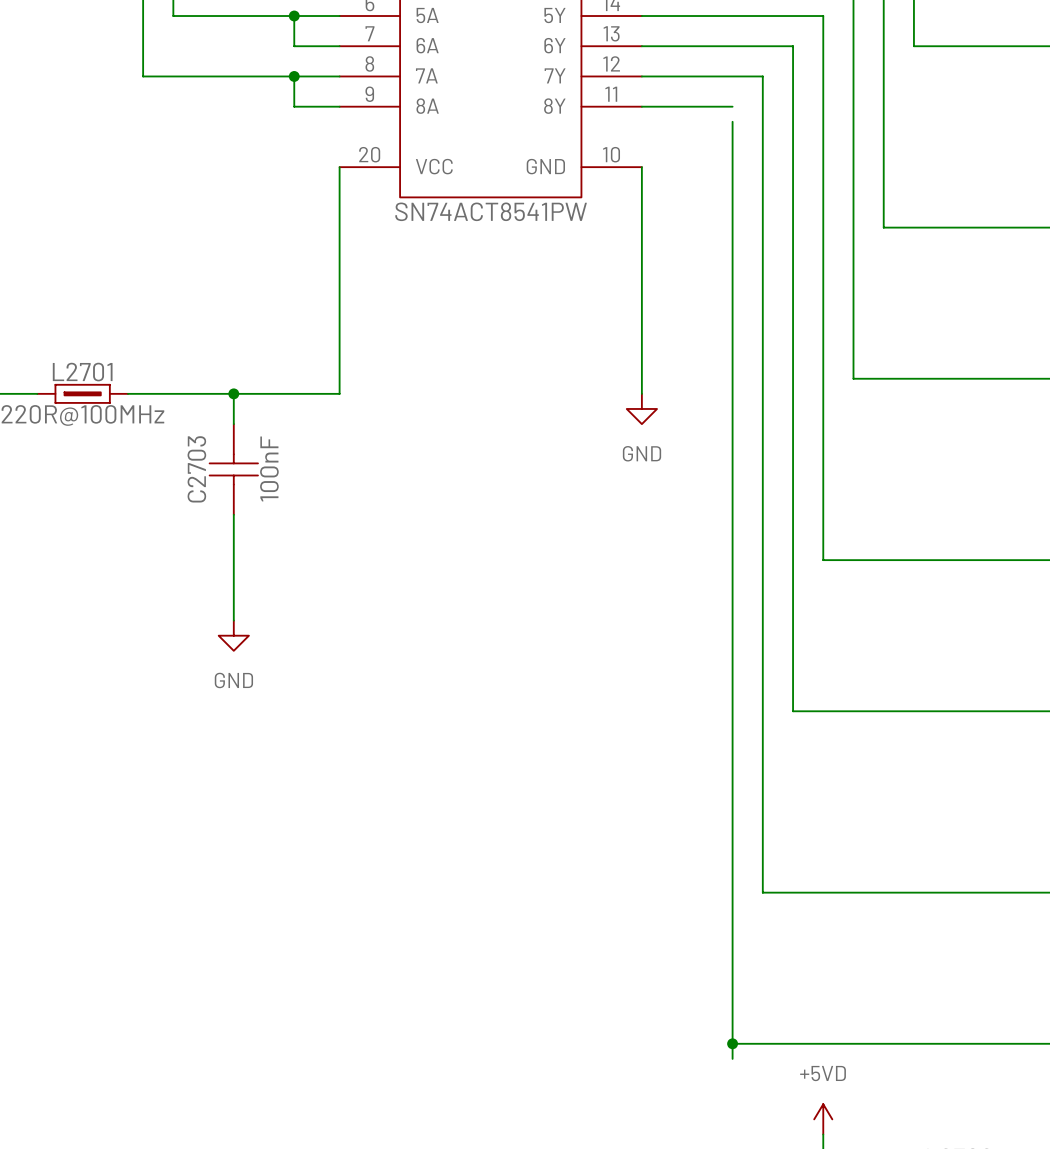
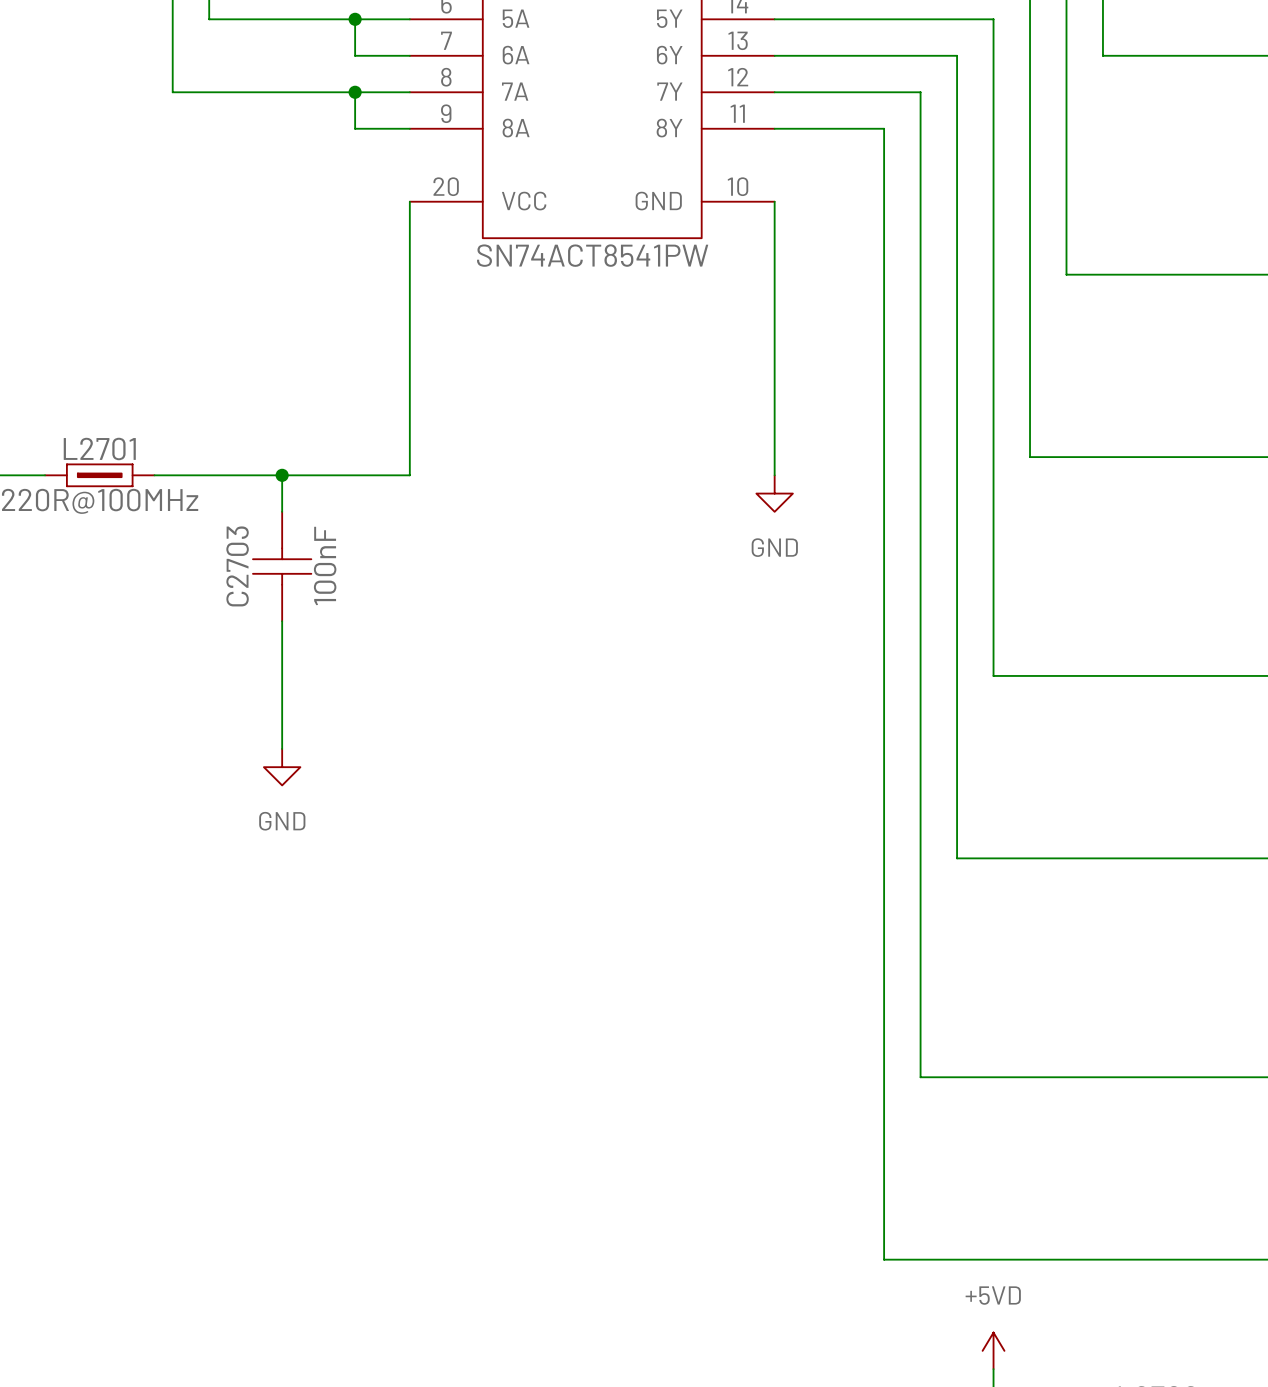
wire: none -> (884, 128) (884, 147)
wire: (732, 1043) (732, 1058) -> none
junction: (732, 1043) -> none

